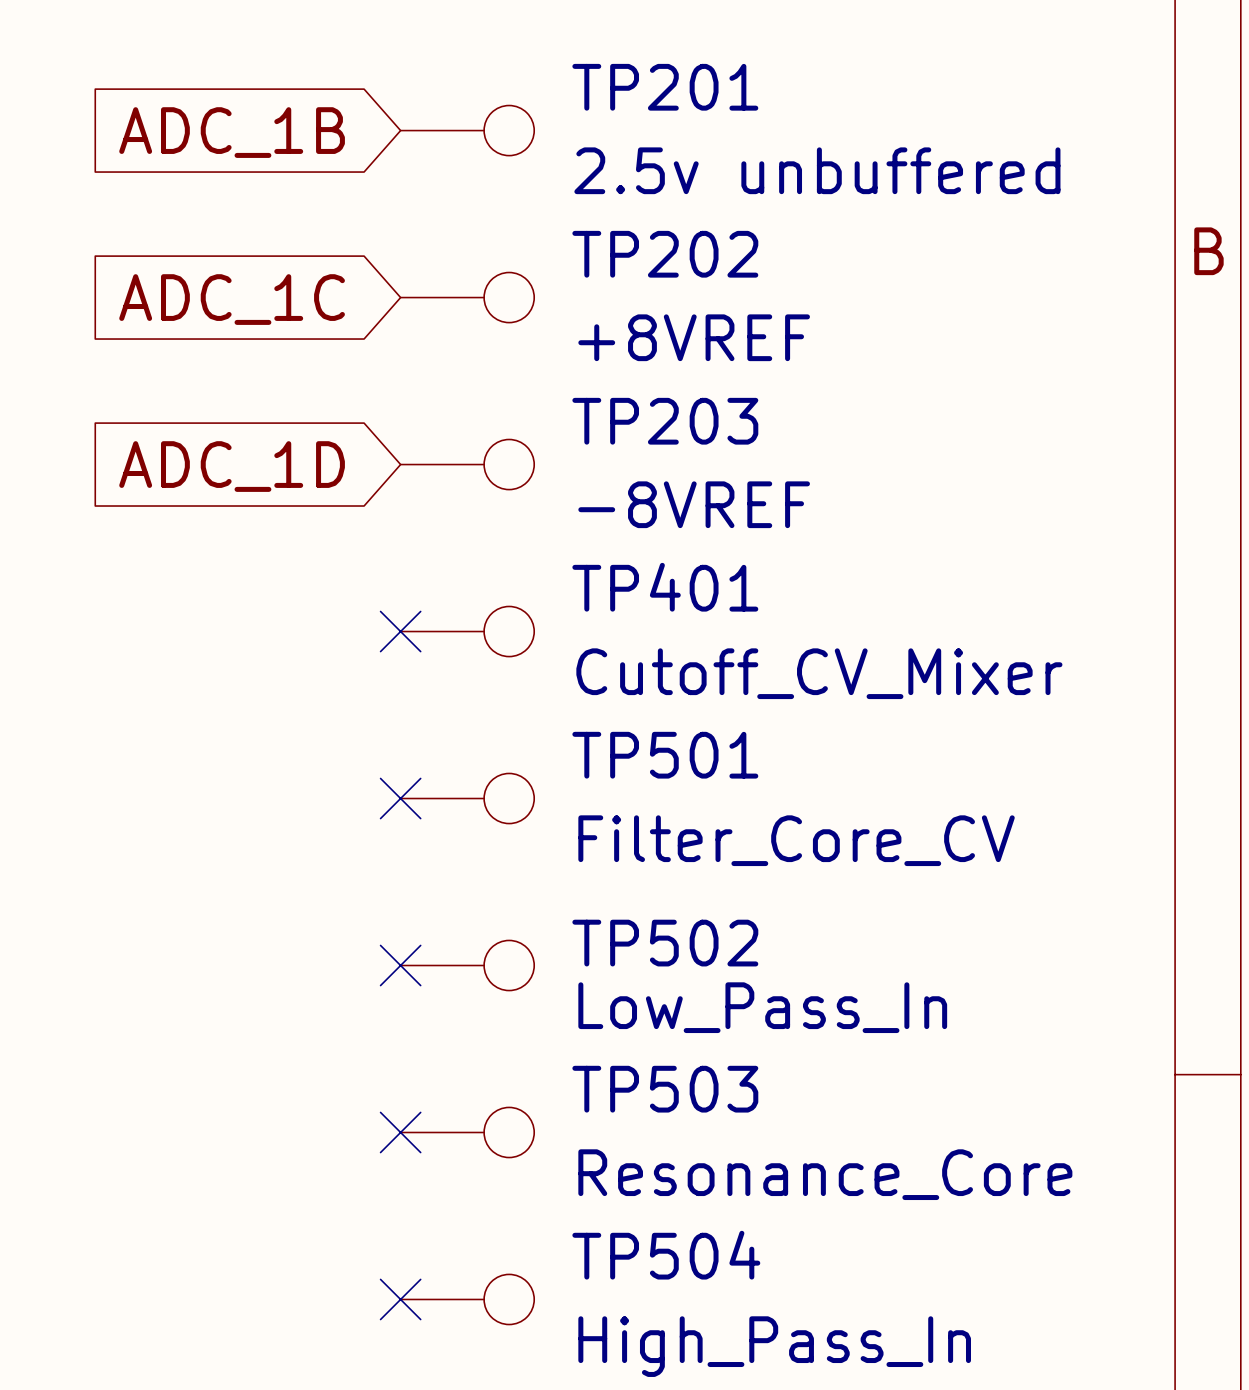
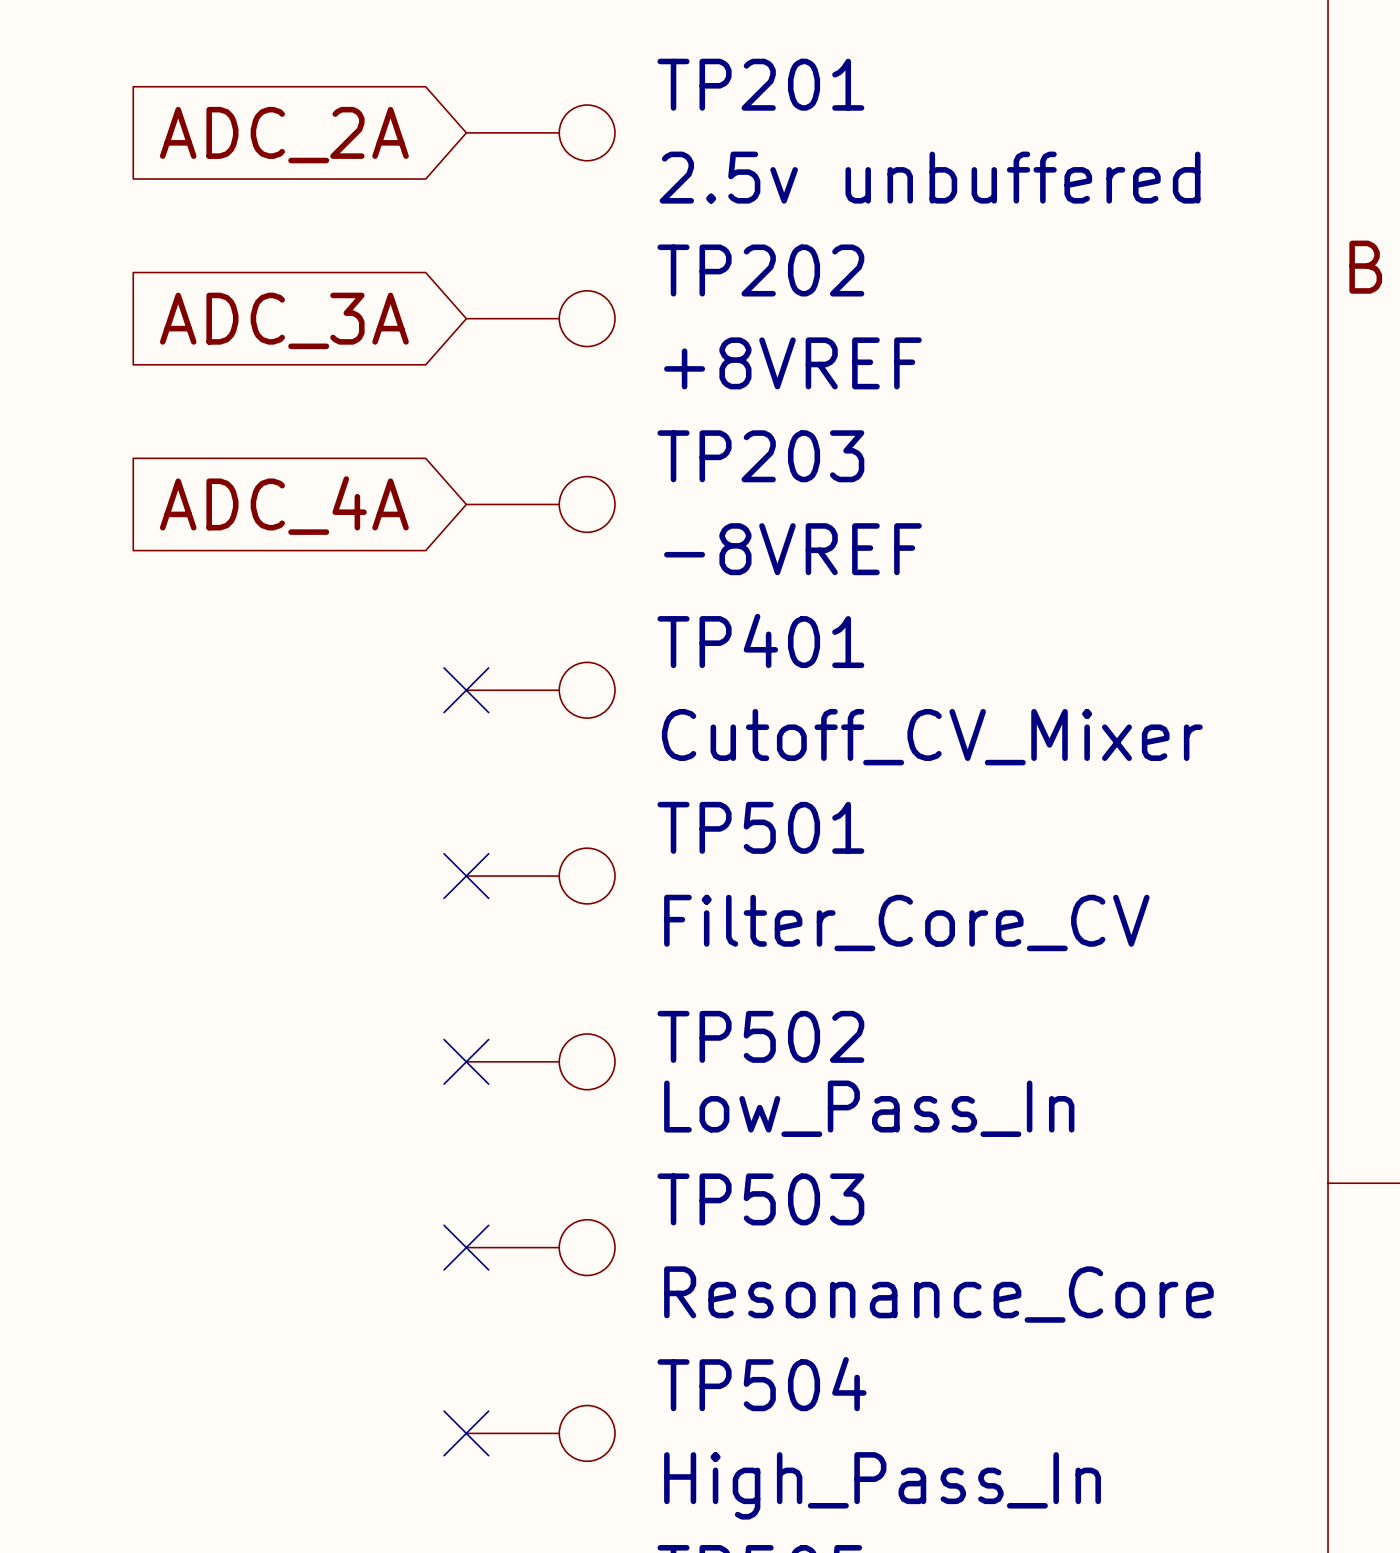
global label: ADC_1B (232, 132) -> ADC_2A (284, 135)
global label: ADC_1C (232, 299) -> ADC_3A (284, 320)
global label: ADC_1D (232, 466) -> ADC_4A (284, 505)

